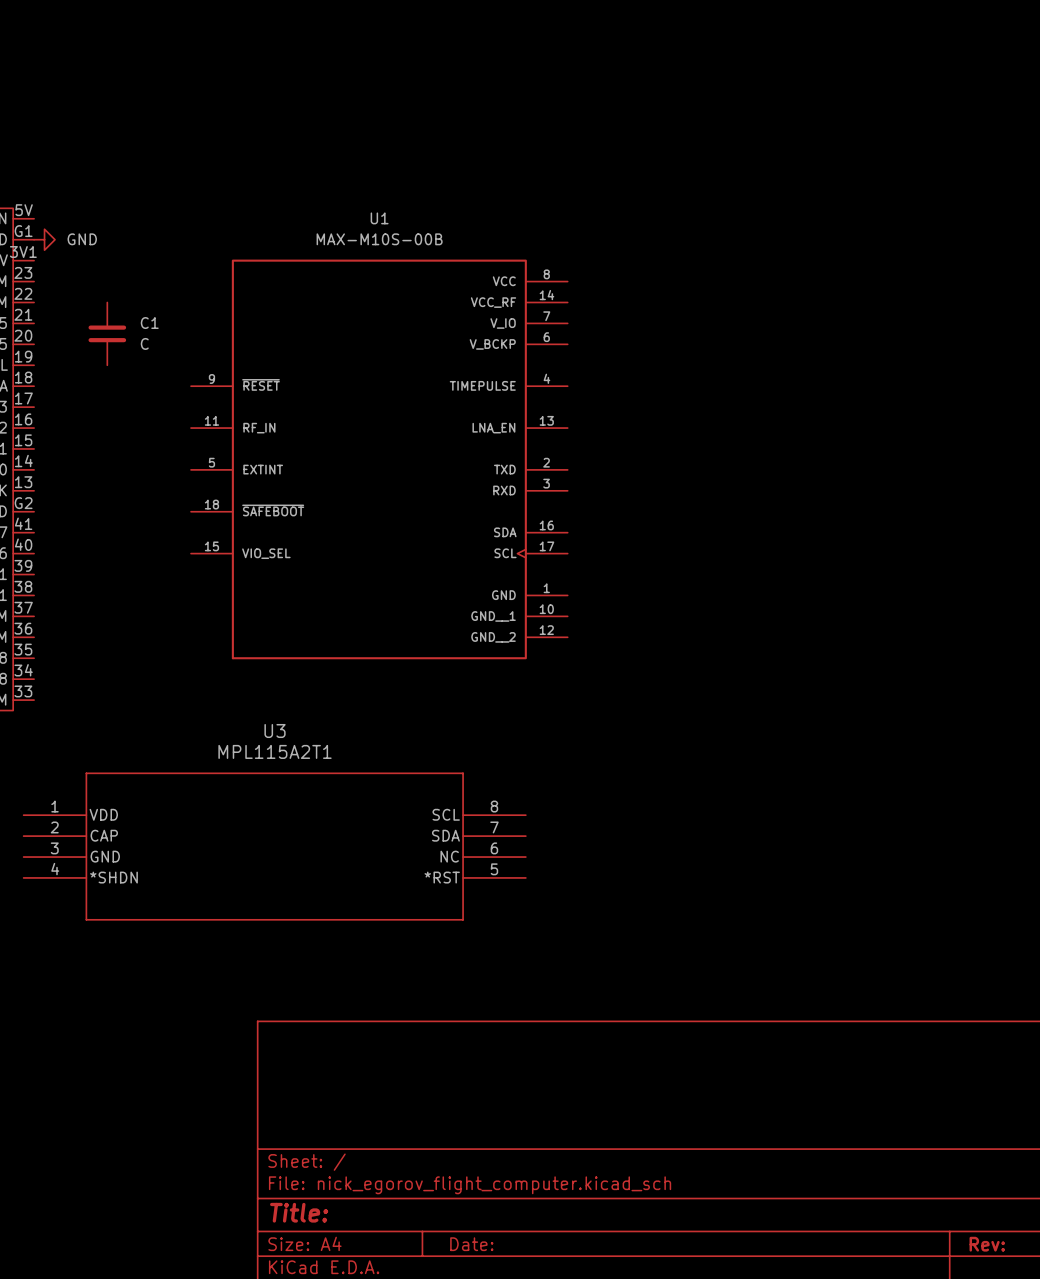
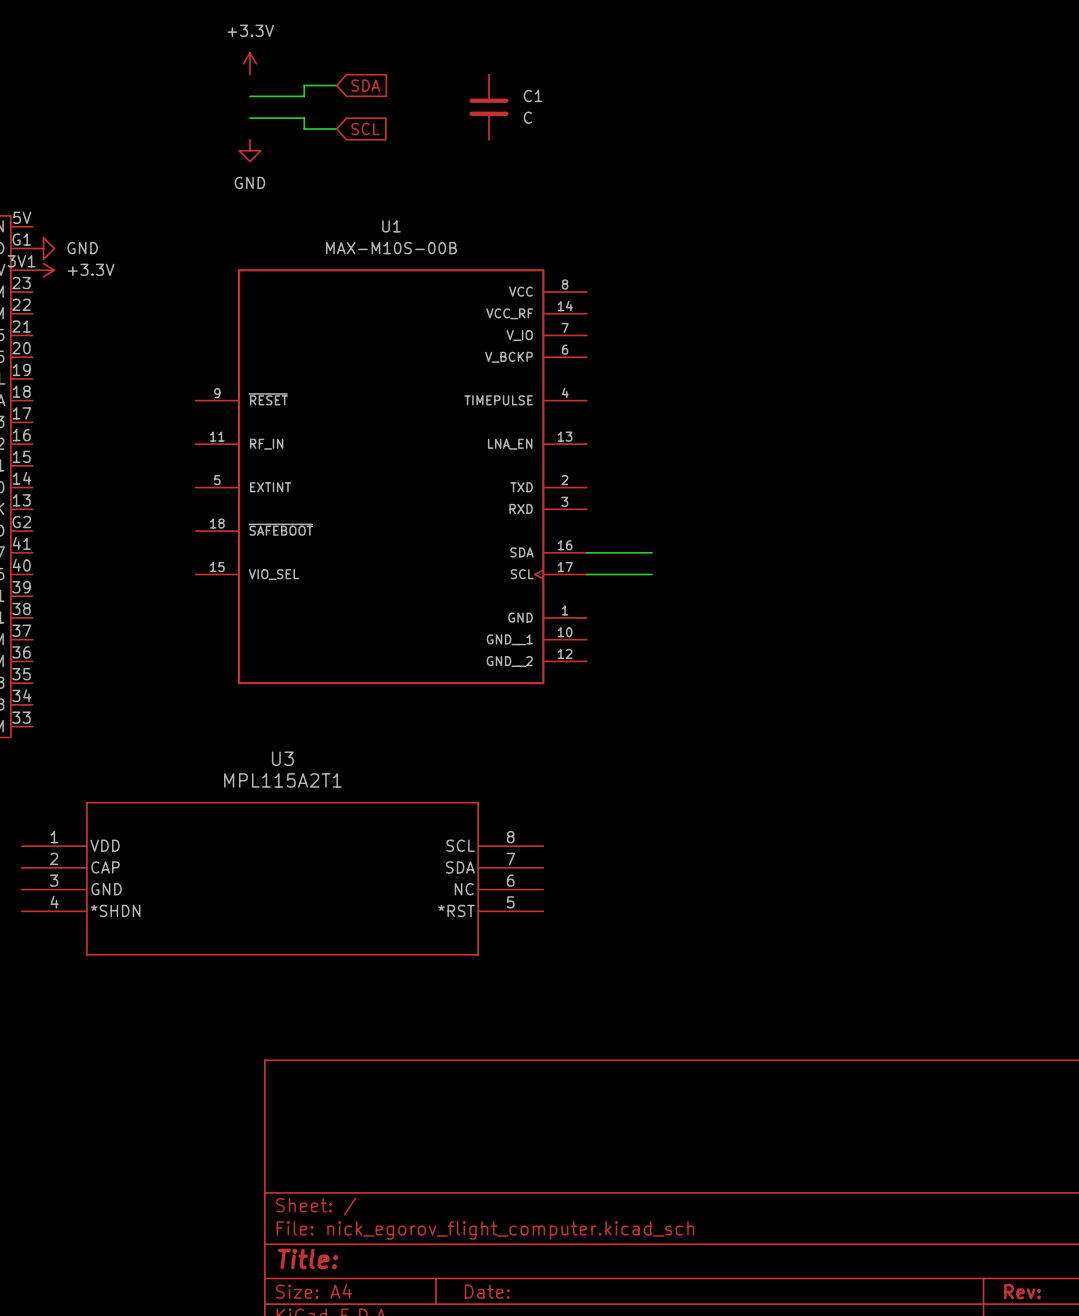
power symbol: none -> +3.3V (249, 63)
wire: none -> (336, 85) (304, 85) (304, 96) (249, 96)
global label: none -> SDA (365, 85)
wire: none -> (249, 118) (304, 118) (304, 128) (336, 128)
global label: none -> SCL (365, 128)
power symbol: none -> GND (249, 150)
power symbol: none -> +3.3V (43, 270)
C1 position: (107, 333) -> (489, 107)
wire: none -> (586, 552) (651, 552)
wire: none -> (586, 574) (651, 574)

